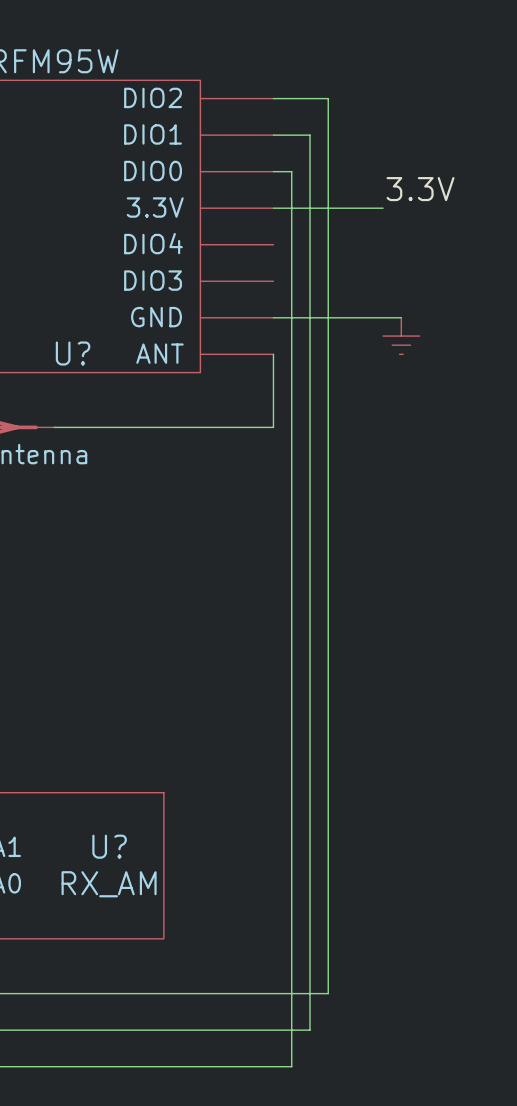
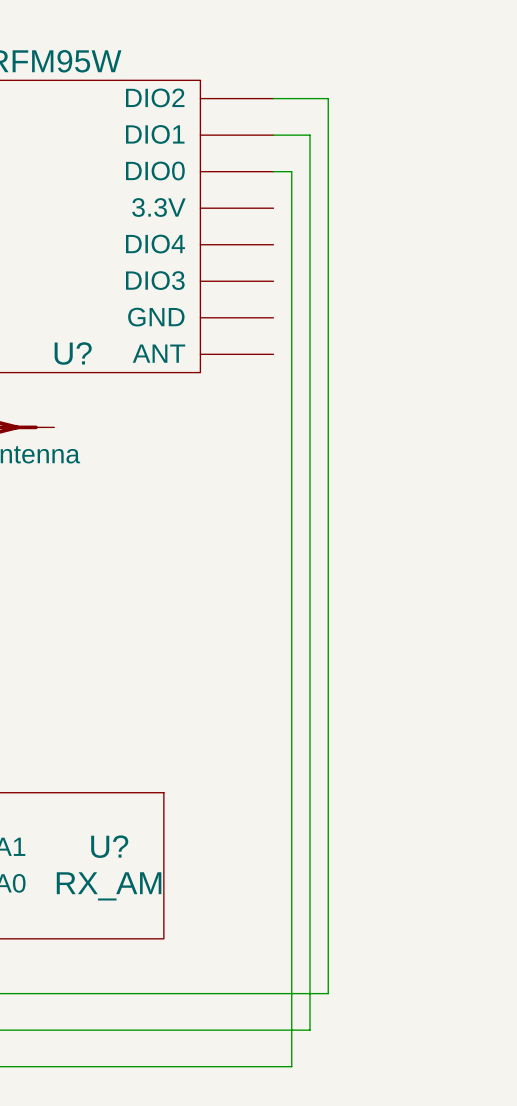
label: 3.3V (420, 189) -> none
wire: (273, 208) (383, 208) -> none
wire: (273, 317) (401, 317) -> none
power symbol: (401, 336) -> none
wire: (273, 354) (273, 427) (54, 427) -> none

